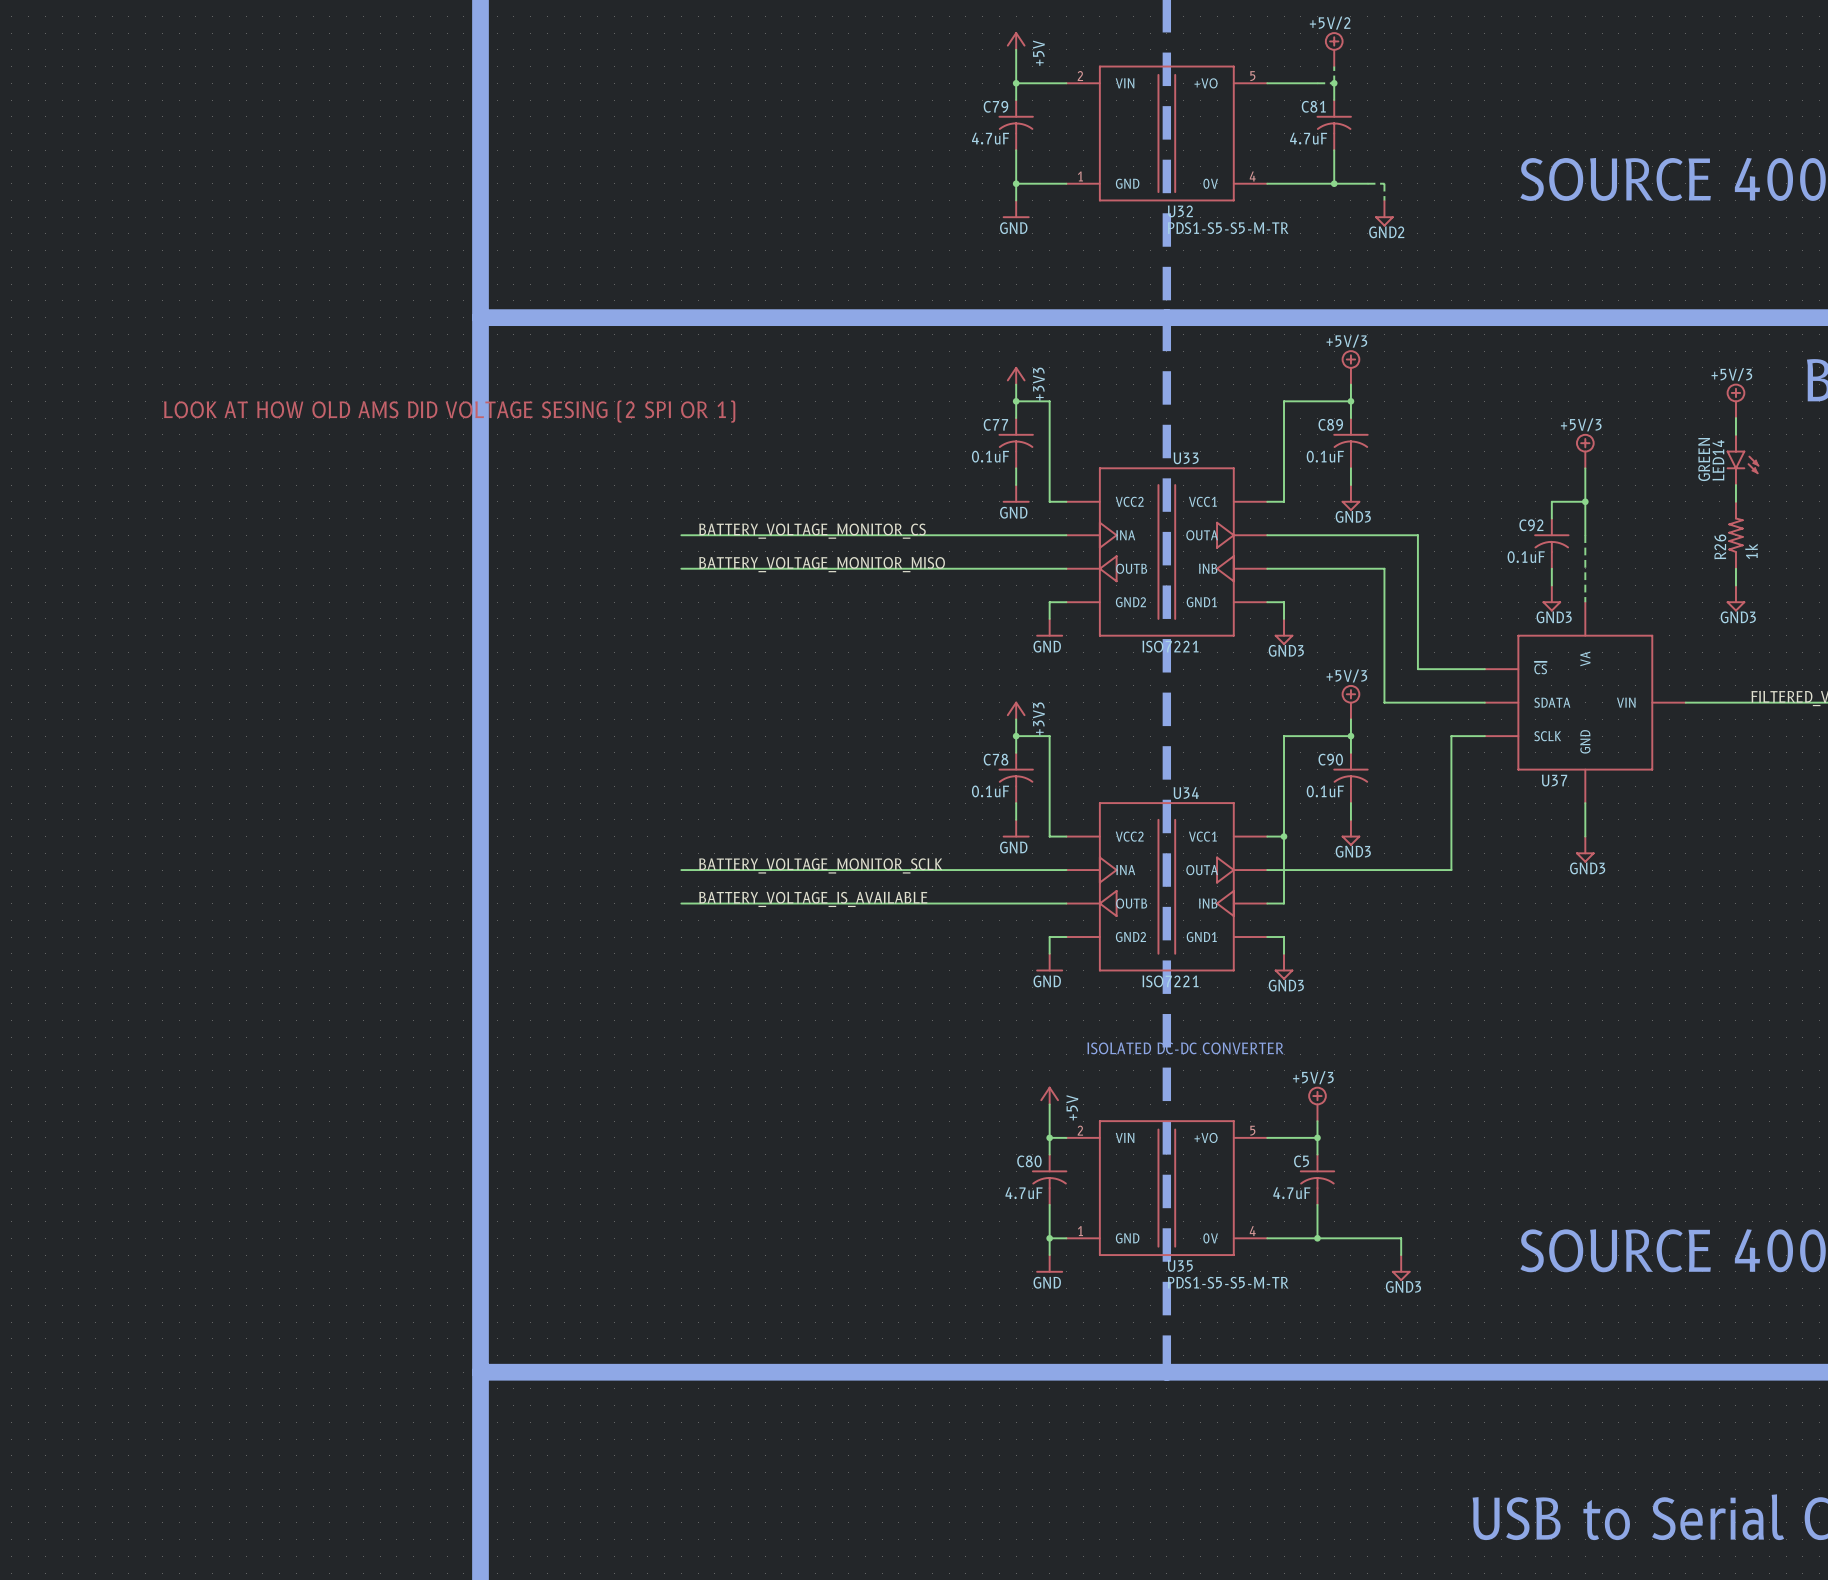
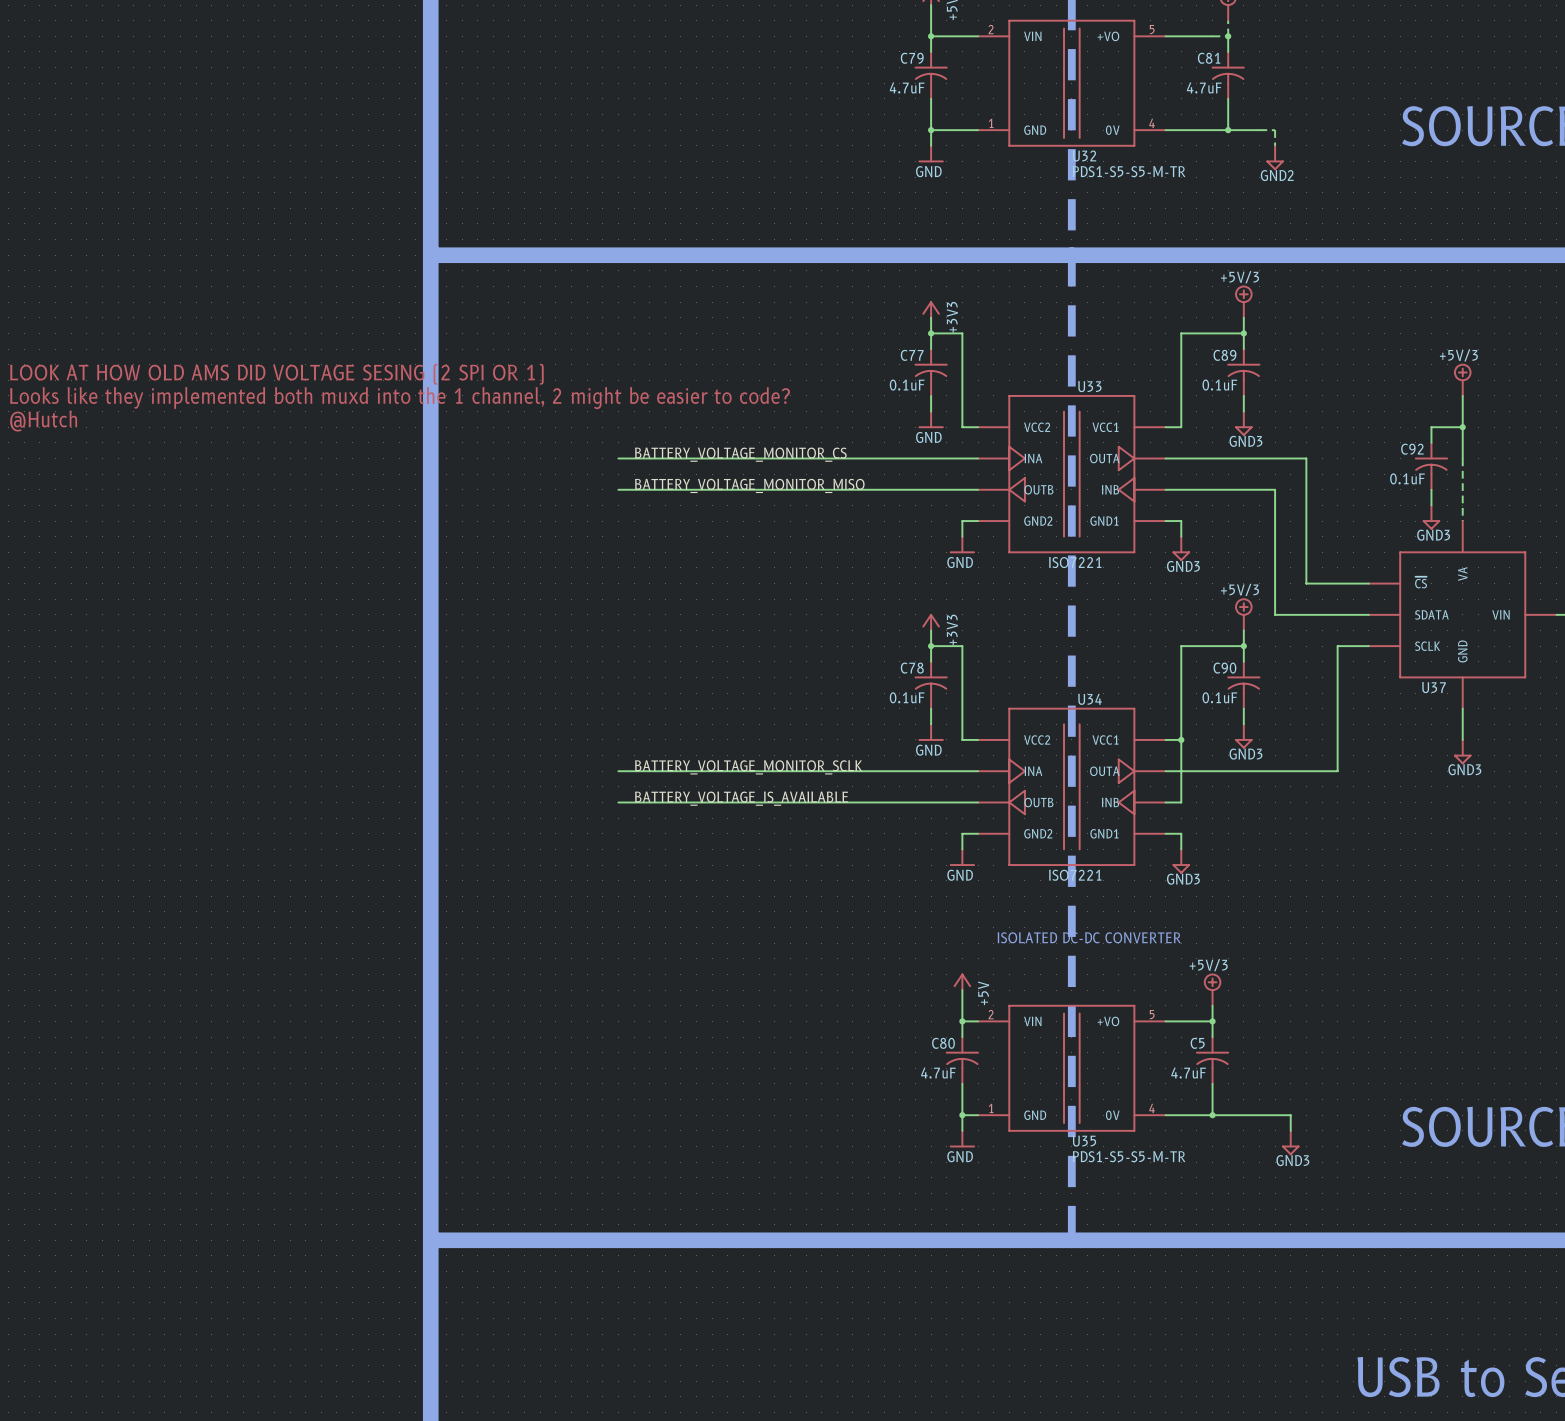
text position: LOOK AT HOW OLD AMS DID VOLTAGE SESING (2 SPI OR 1) (449, 411) -> LOOK AT HOW OLD AMS DID VOLTAGE SESING (2 SPI OR 1) (276, 374)
text: none -> Looks like they implemented both muxd into the 1 channel, 2 might be easier to code? (400, 398)
text: none -> @Hutch (43, 421)

